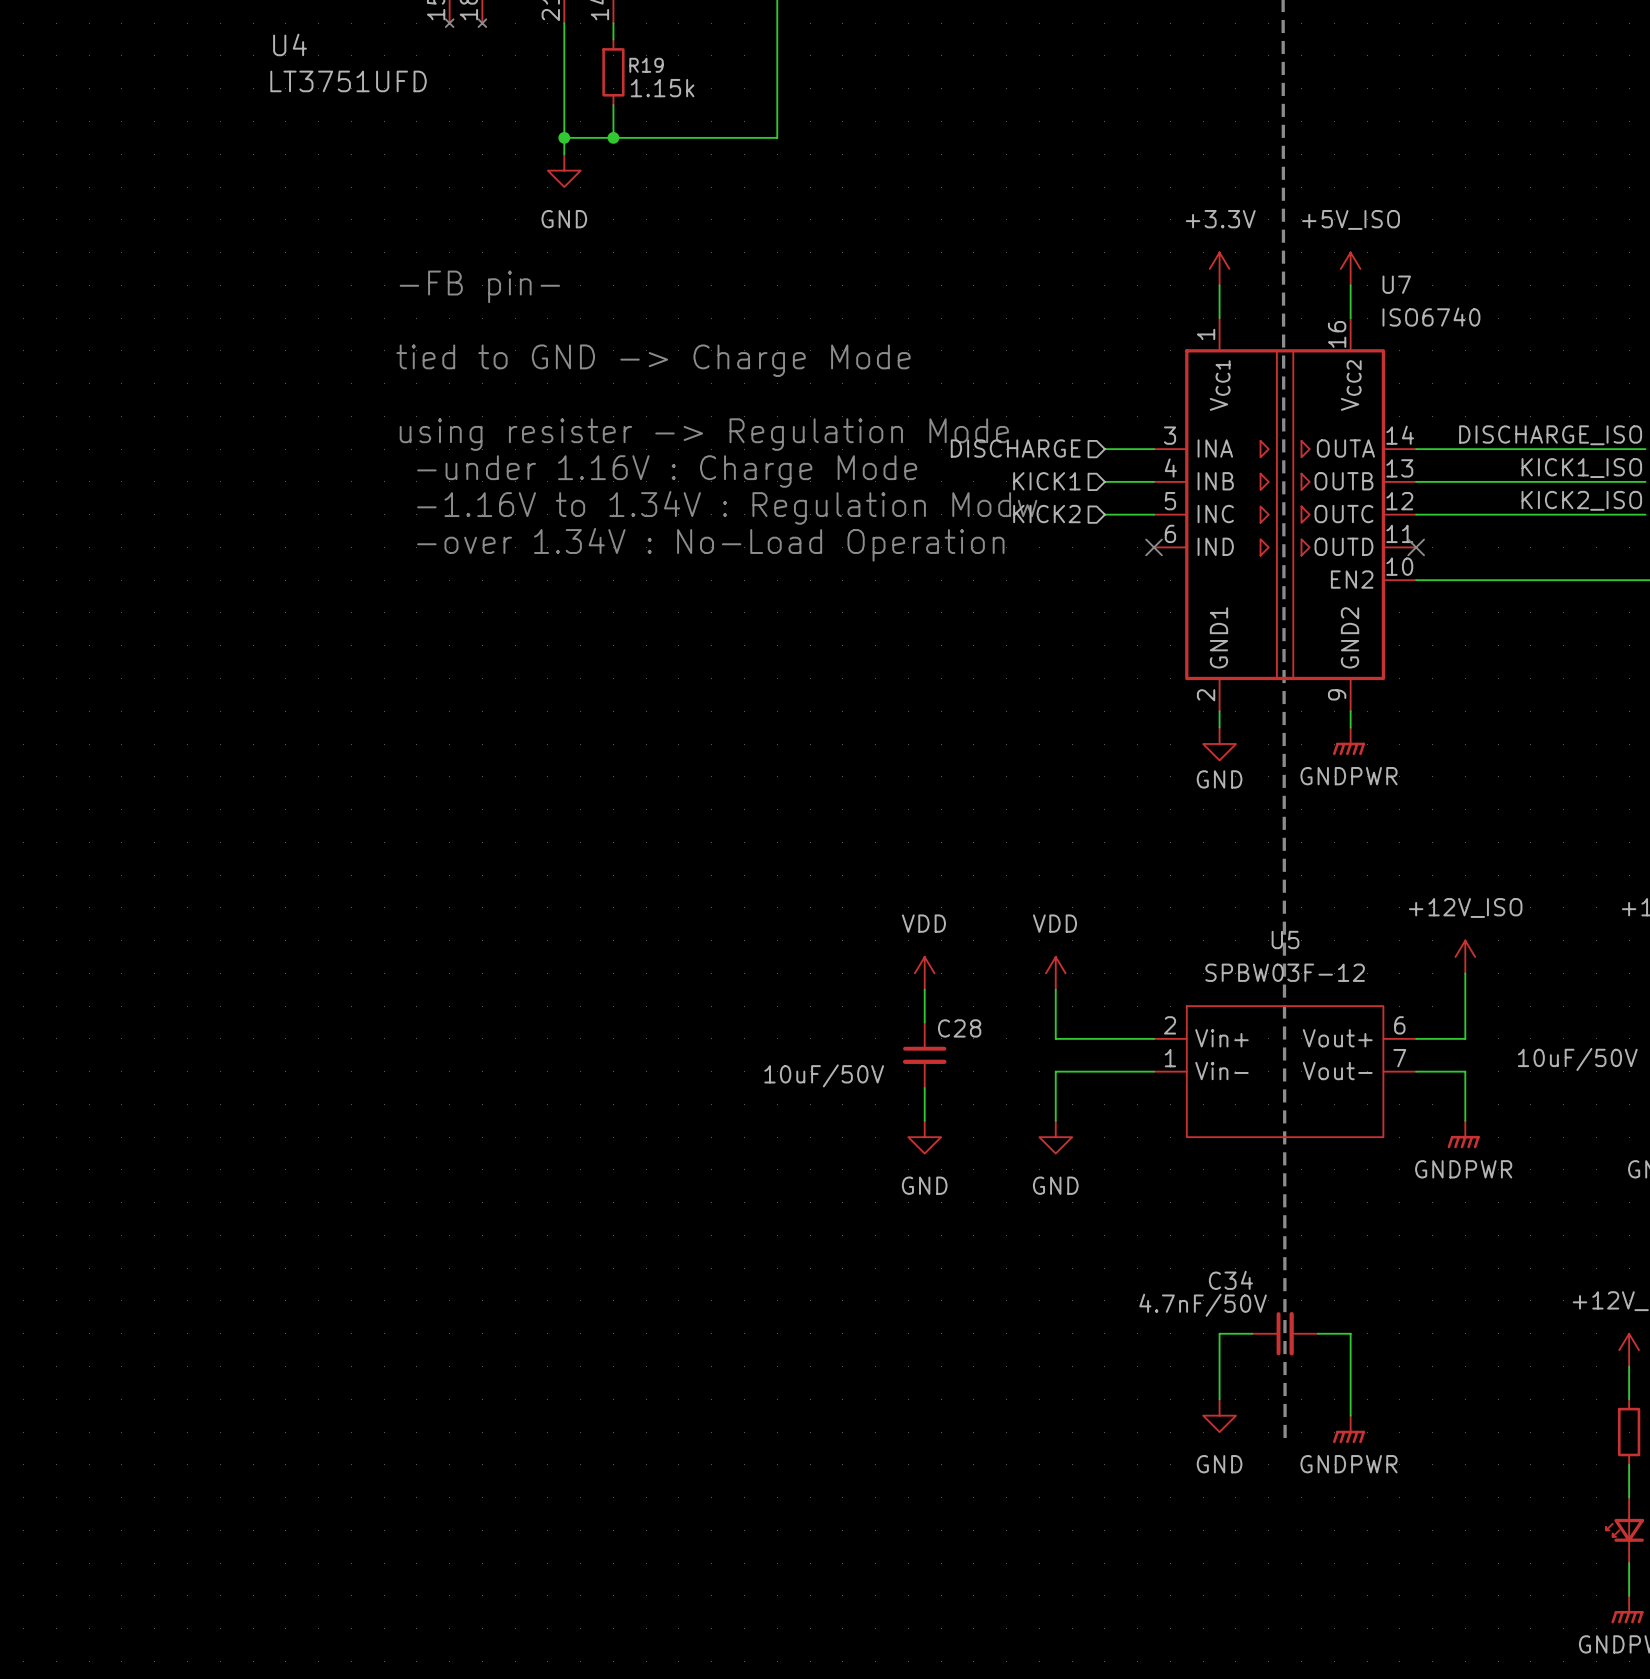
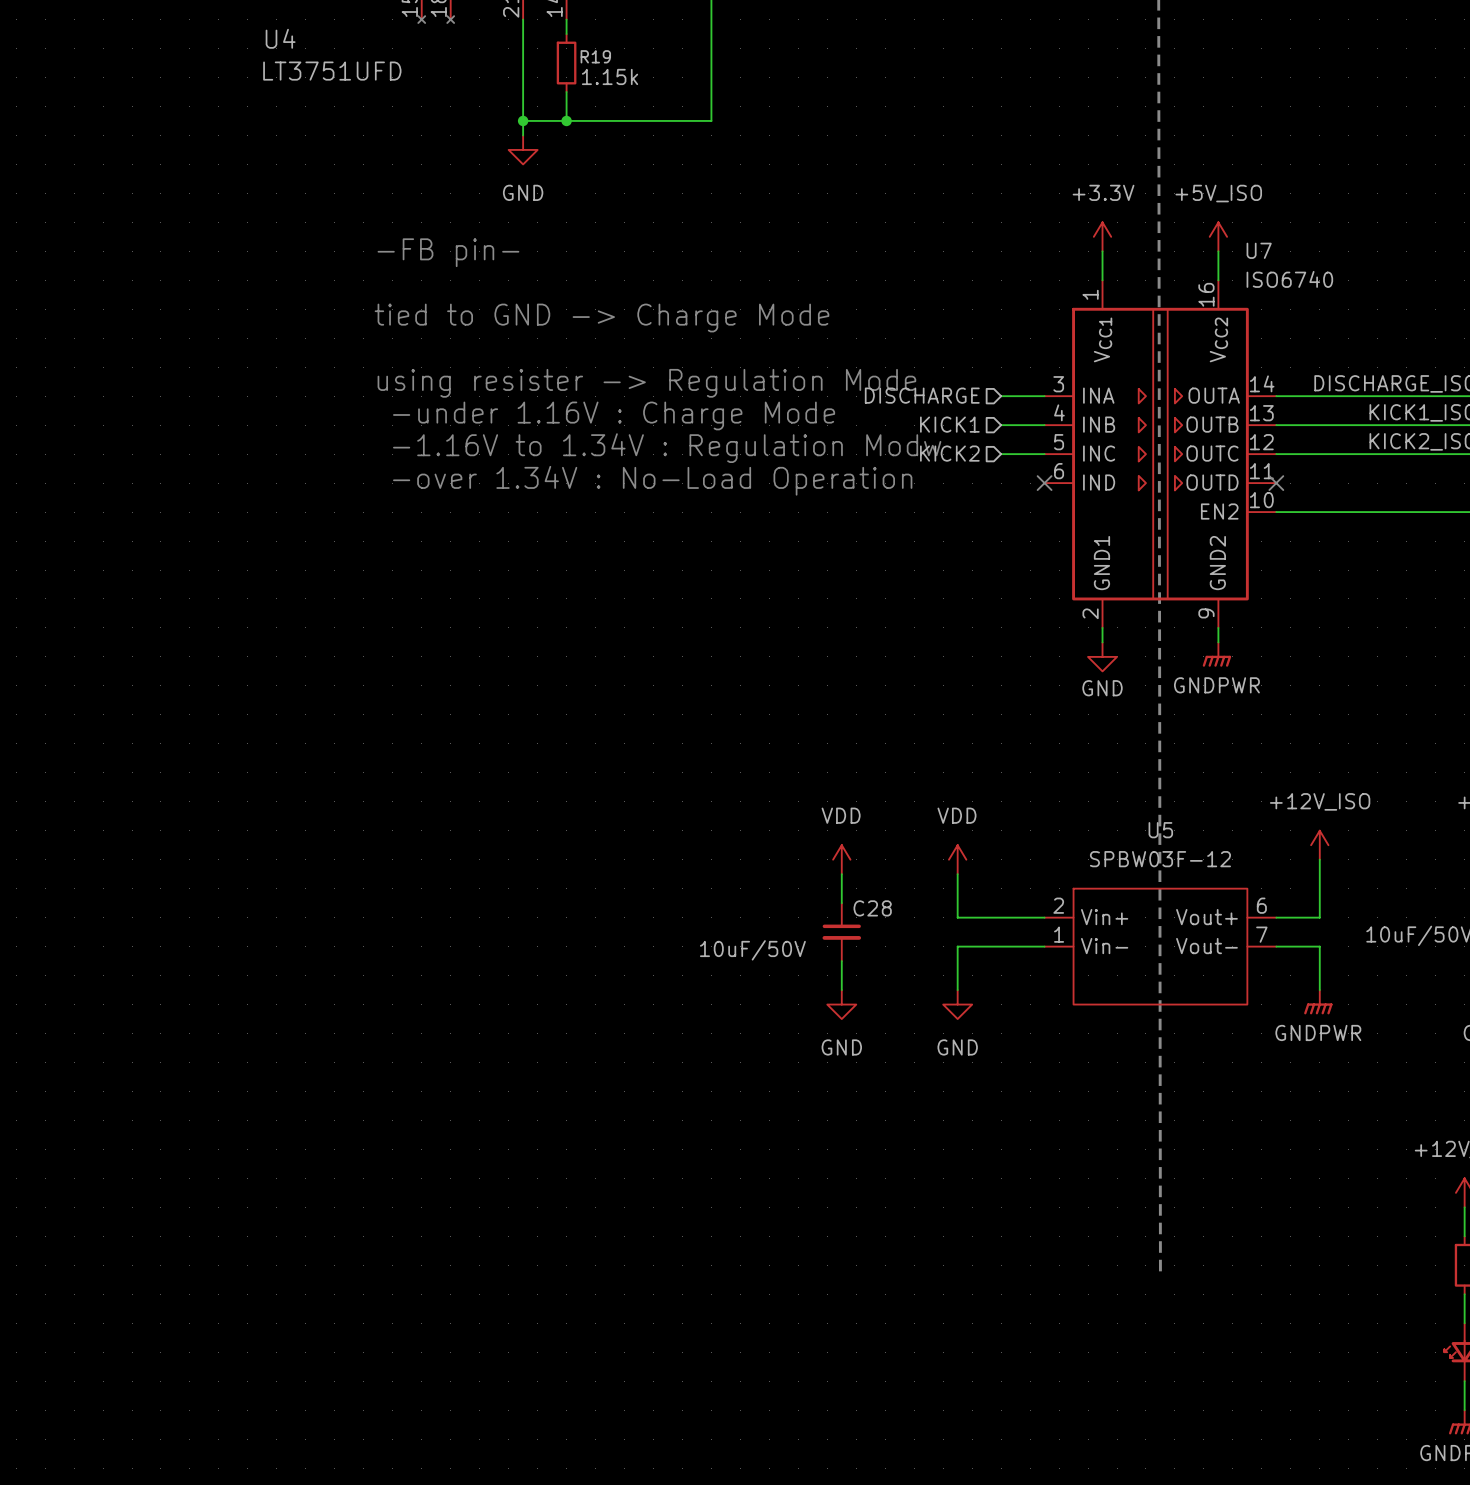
wire: (1252, 1333) (1219, 1333) (1219, 1399) -> none
C34: 4.7nF/50V (1285, 1333) -> none
wire: (1317, 1333) (1350, 1333) (1350, 1415) -> none
power symbol: GND (1219, 1415) -> none
power symbol: GNDPWR (1348, 1429) -> none

